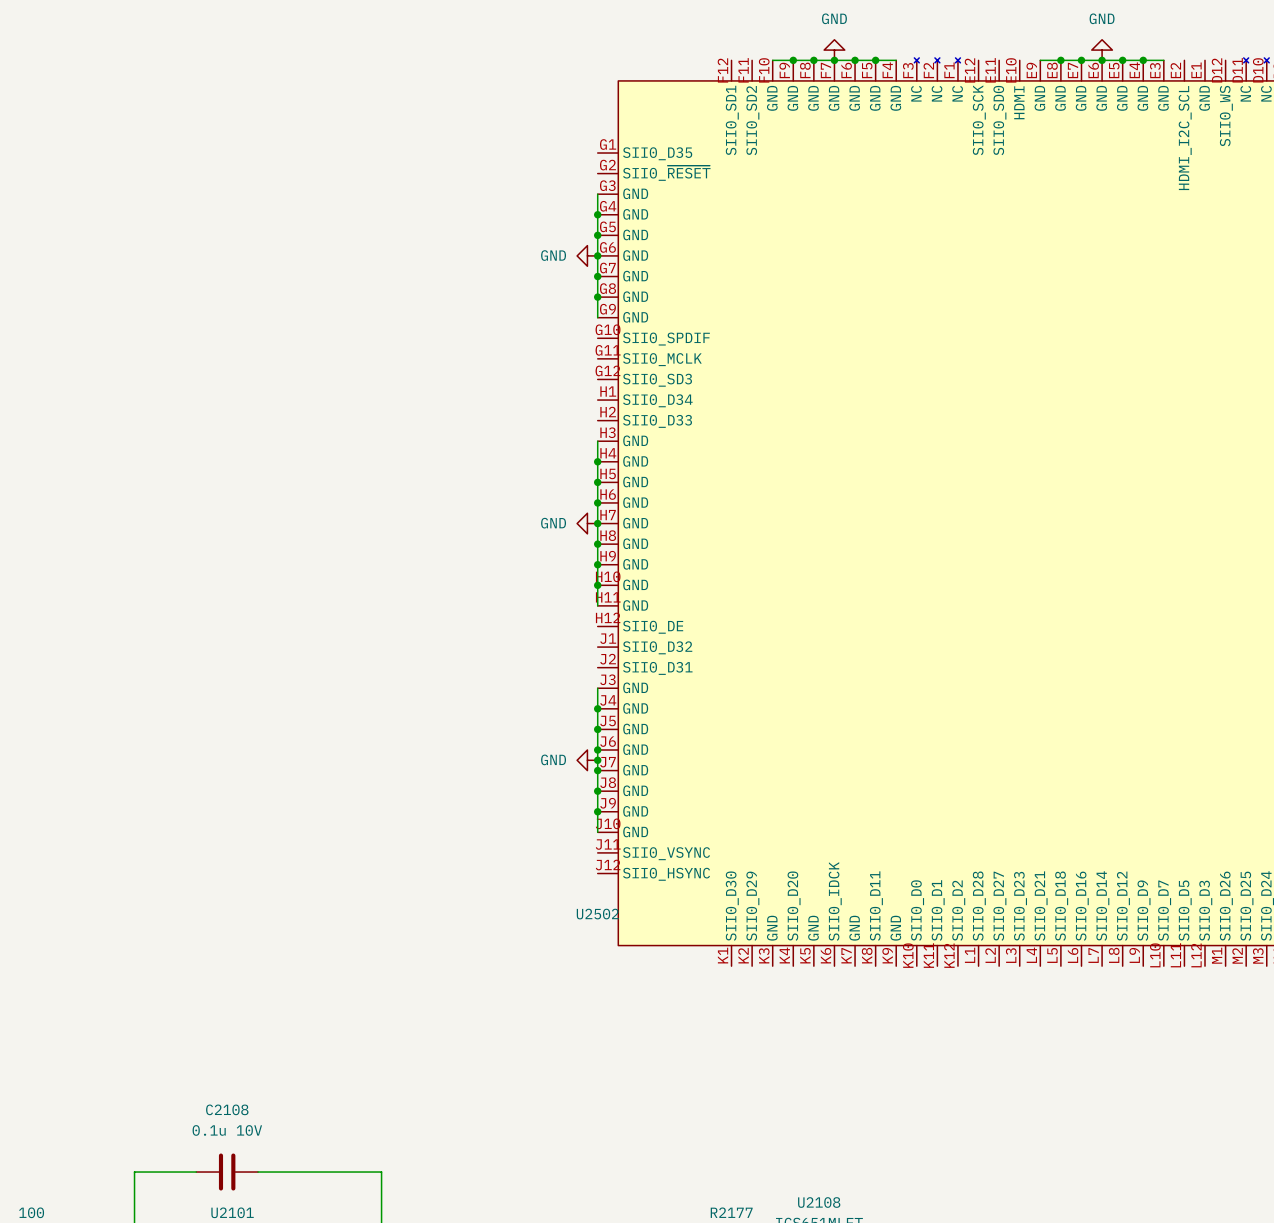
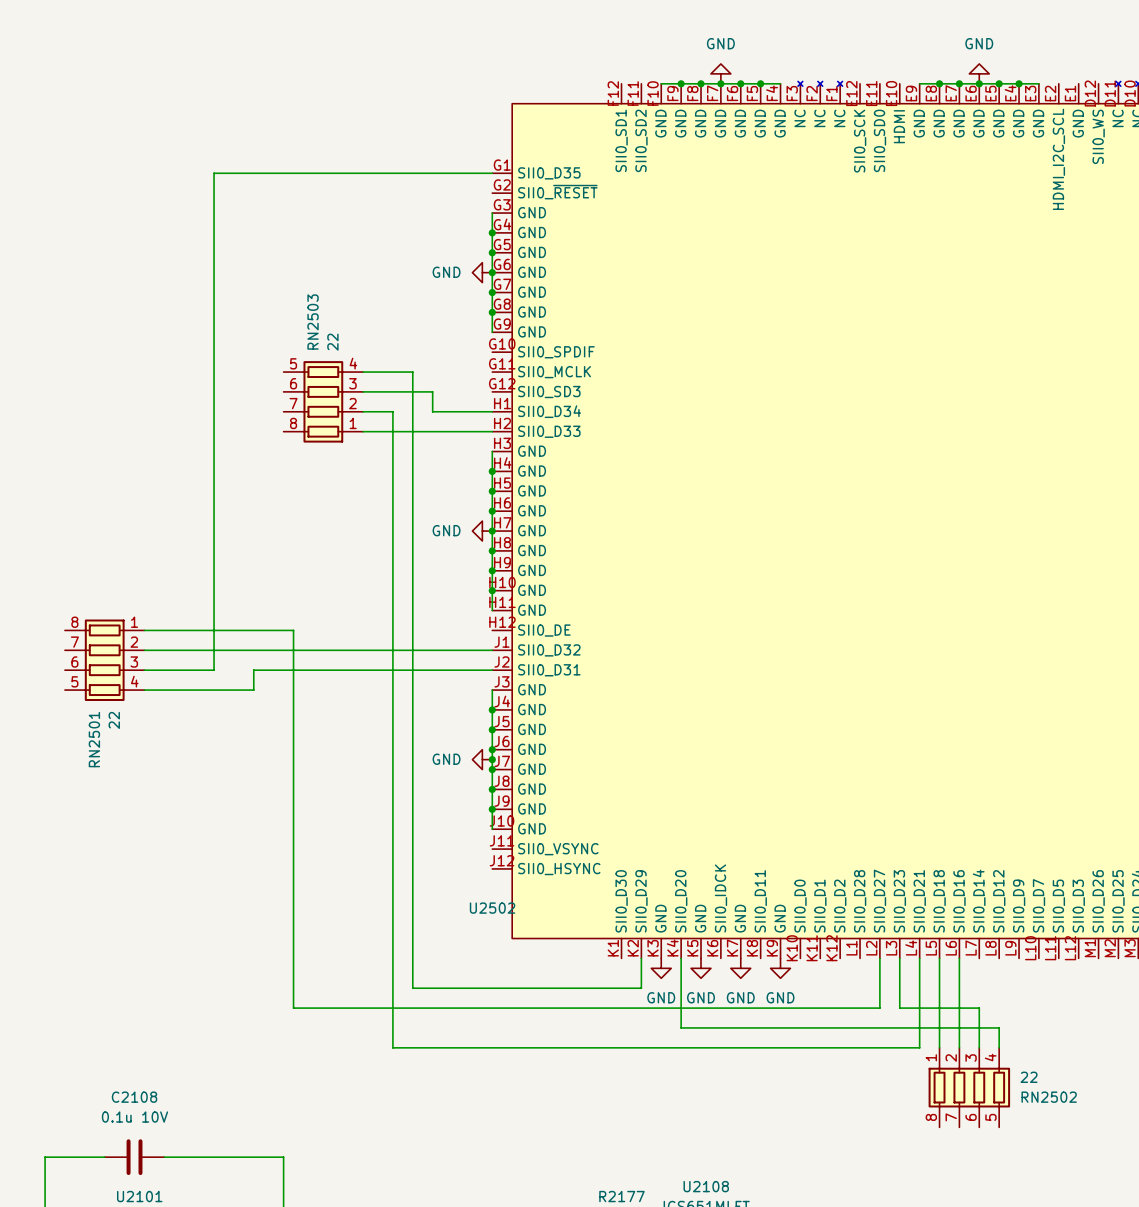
wire: none -> (492, 173) (214, 173) (214, 670) (144, 670)
wire: none -> (363, 372) (412, 372) (412, 988) (641, 988) (641, 958)
wire: none -> (363, 391) (432, 391) (432, 411) (492, 411)
RN2503: none -> 22 (323, 401)
wire: none -> (363, 411) (392, 411) (392, 1047) (919, 1047) (919, 958)
wire: none -> (363, 431) (492, 431)
wire: none -> (144, 630) (293, 630) (293, 1008) (879, 1008) (879, 958)
wire: none -> (144, 650) (492, 650)
RN2501: none -> 22 (104, 660)
wire: none -> (492, 670) (253, 670) (253, 690) (144, 690)
wire: none -> (681, 958) (681, 1027) (999, 1027) (999, 1047)
wire: none -> (899, 958) (899, 1008) (979, 1008) (979, 1047)
wire: none -> (939, 958) (939, 1047)
wire: none -> (959, 958) (959, 1047)
power symbol: none -> GND (661, 968)
power symbol: none -> GND (701, 968)
power symbol: none -> GND (740, 968)
power symbol: none -> GND (780, 968)
RN2502: none -> 22 (969, 1087)

